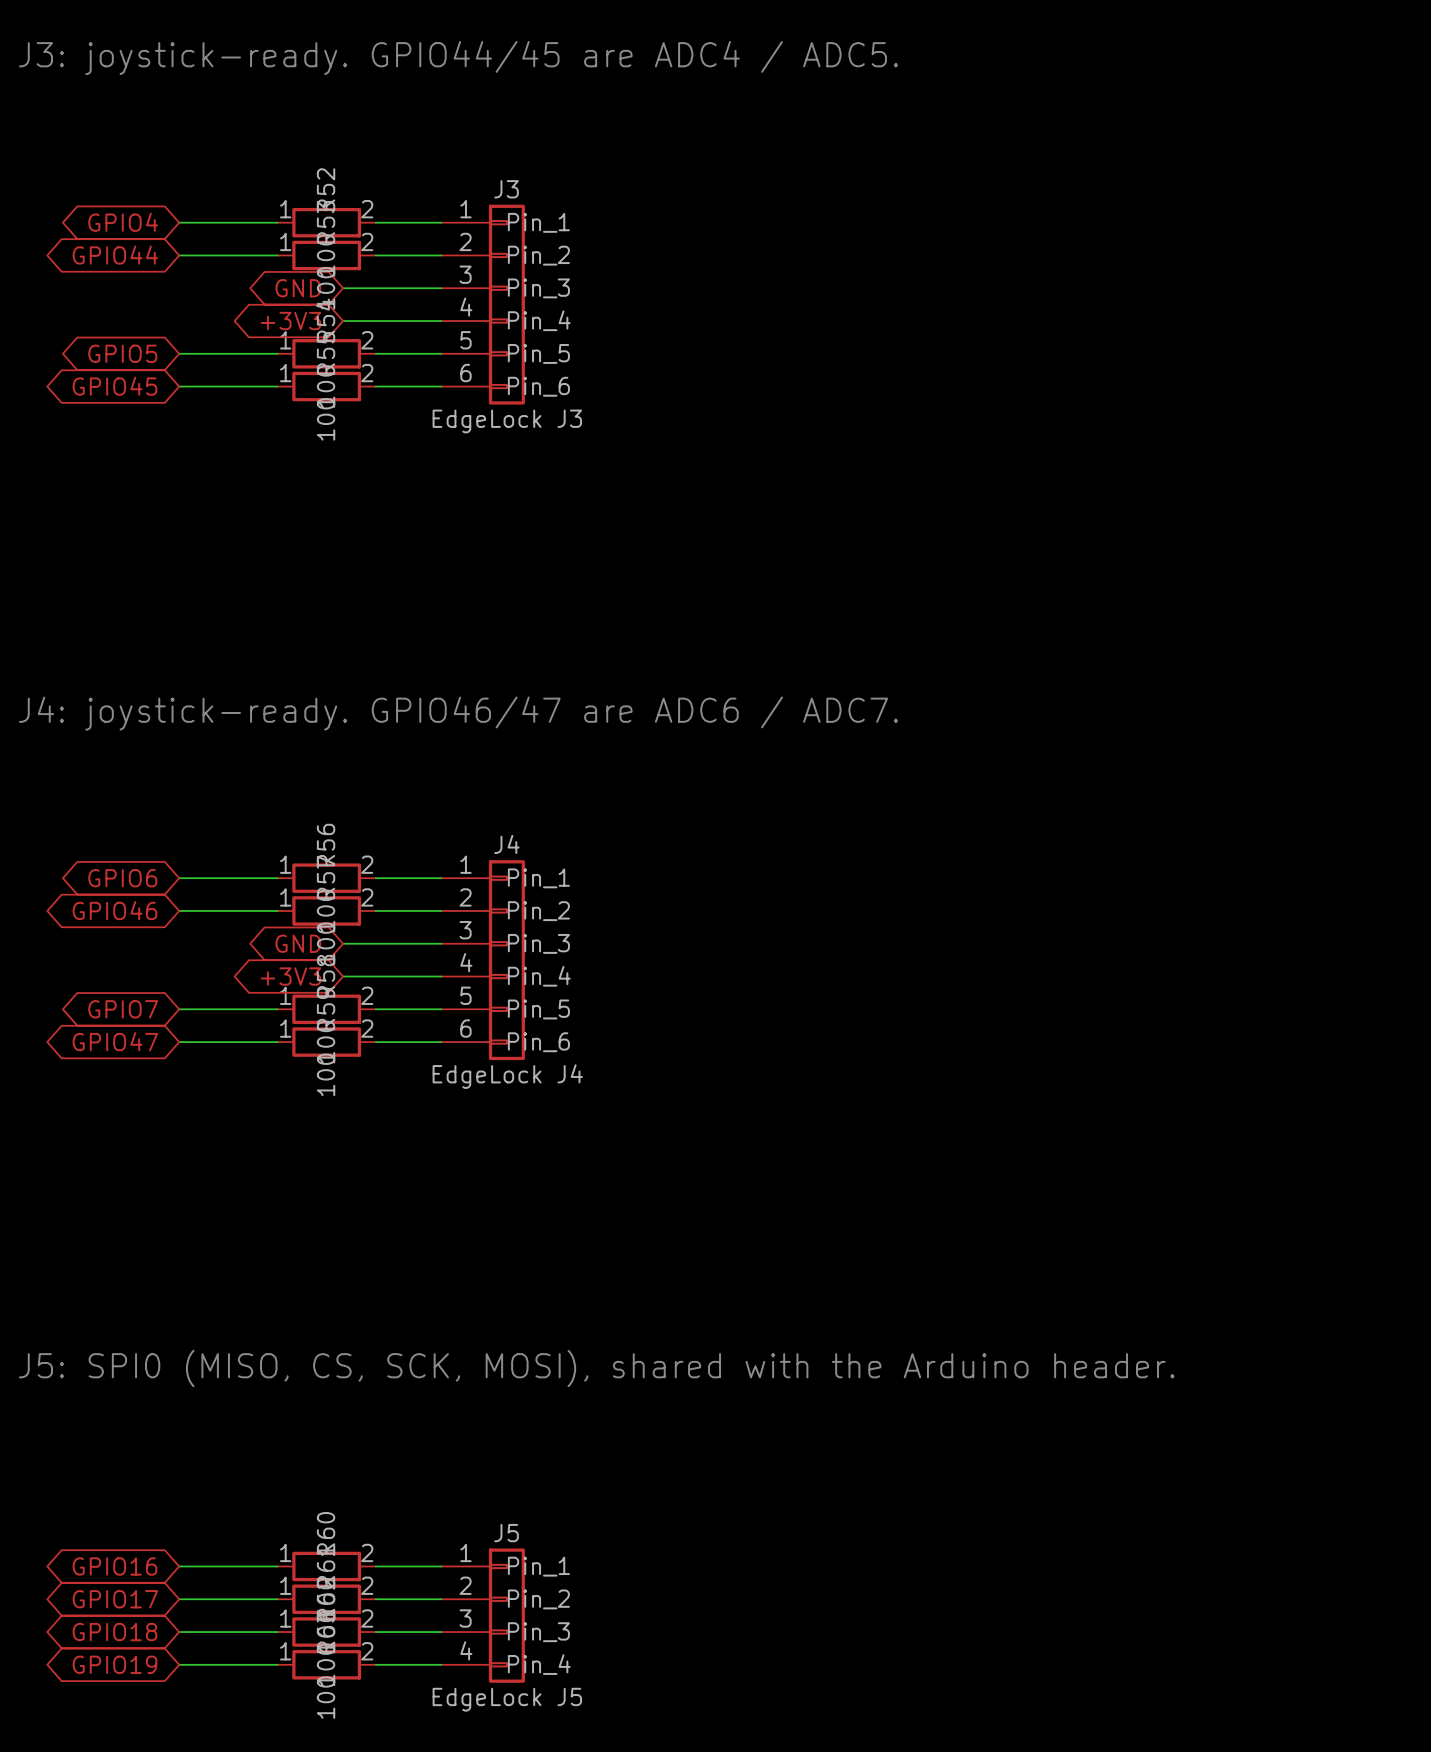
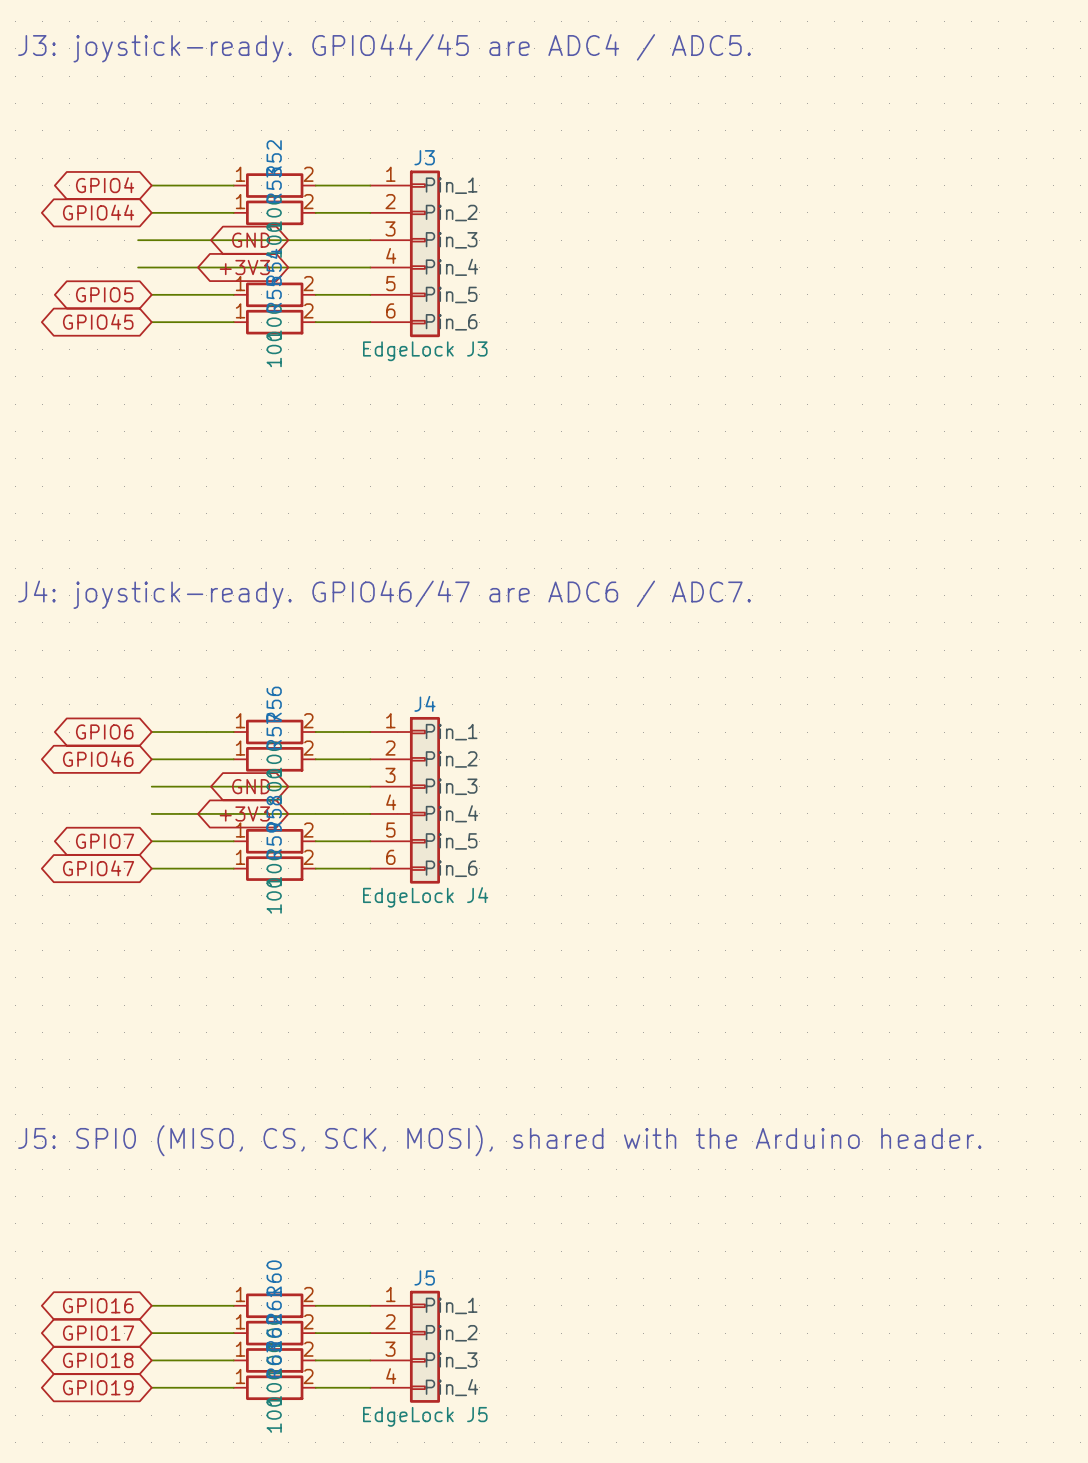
wire: none -> (138, 240) (288, 240)
wire: none -> (138, 267) (288, 267)
wire: none -> (151, 786) (288, 786)
wire: none -> (151, 813) (288, 813)

